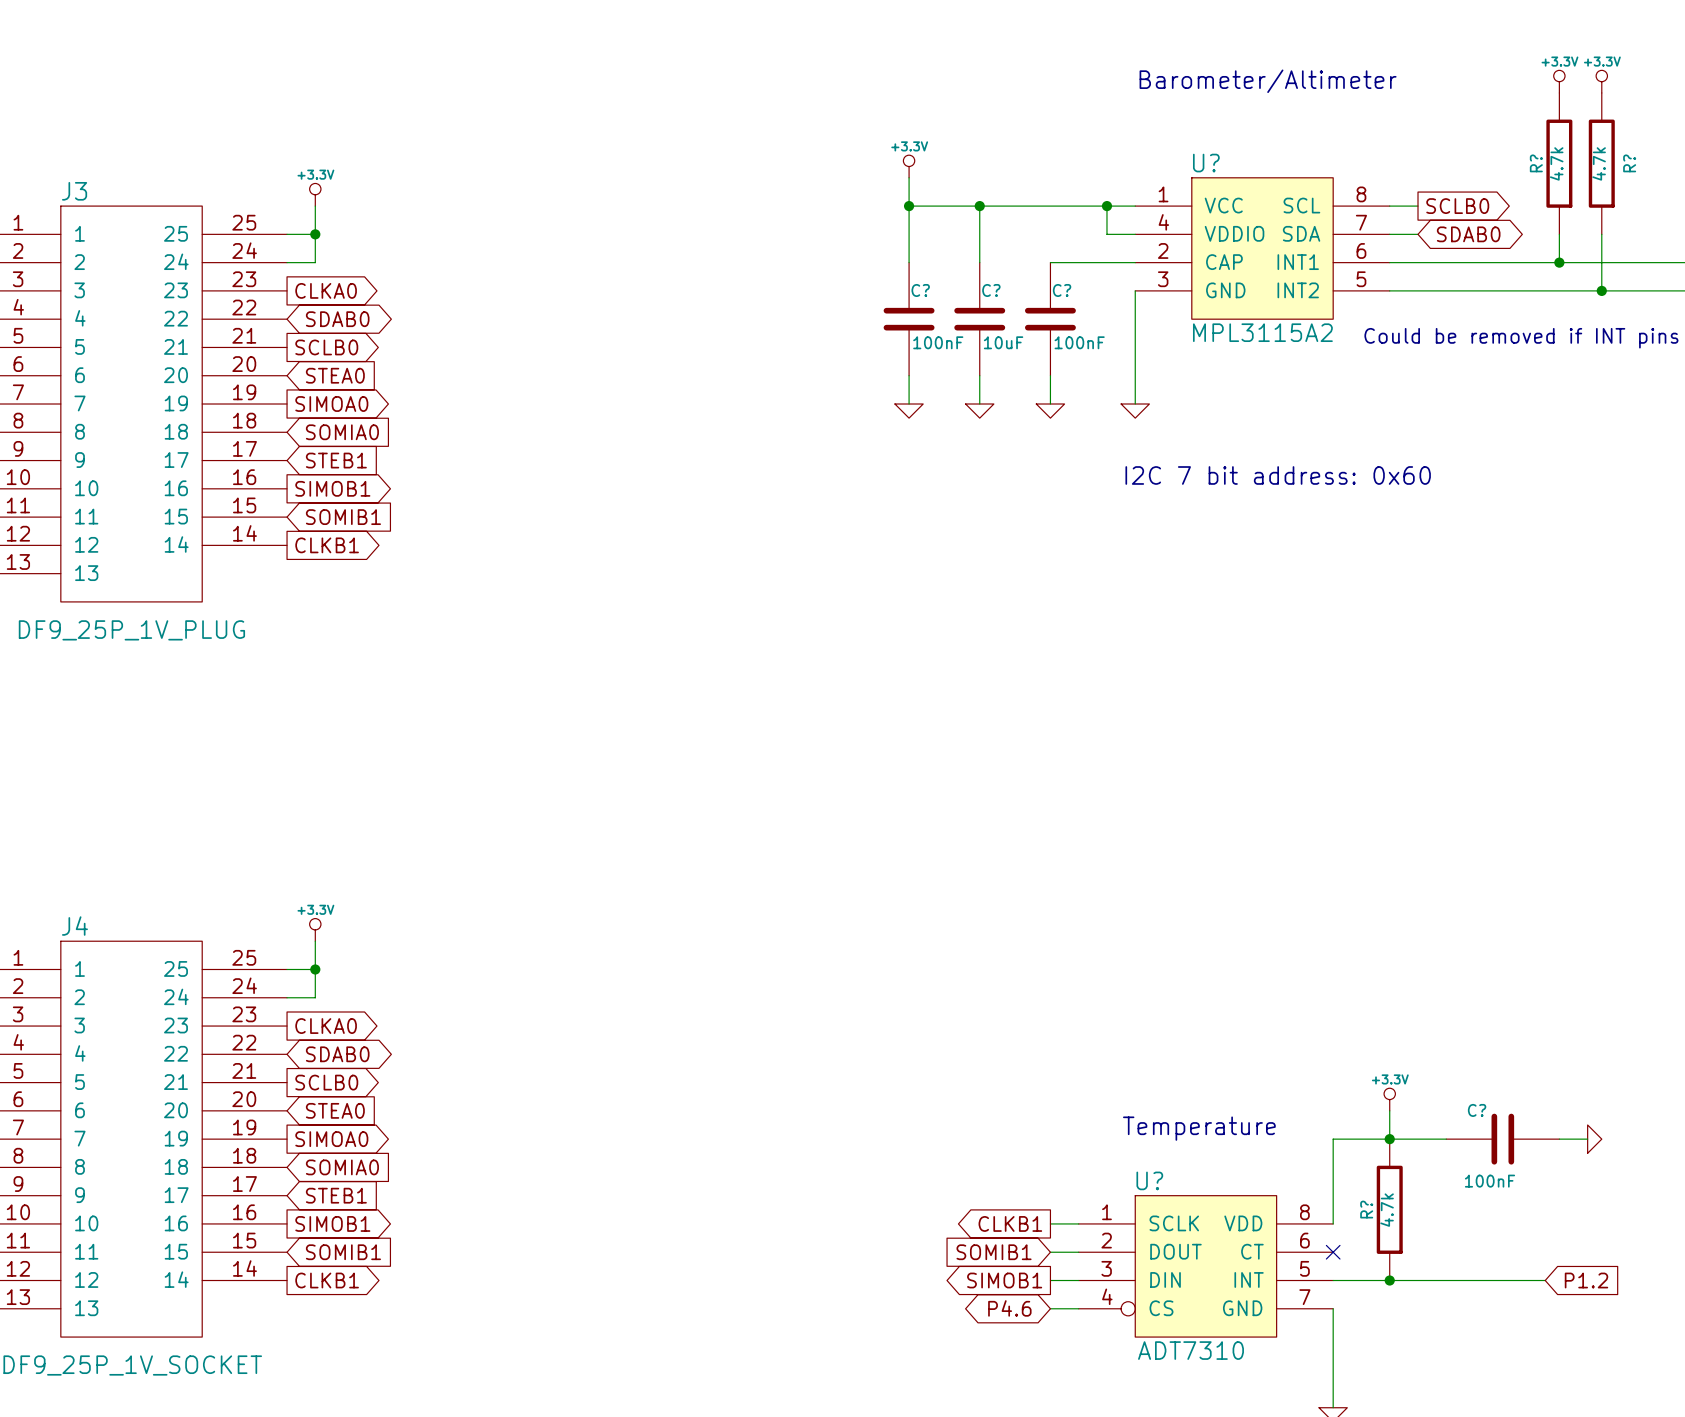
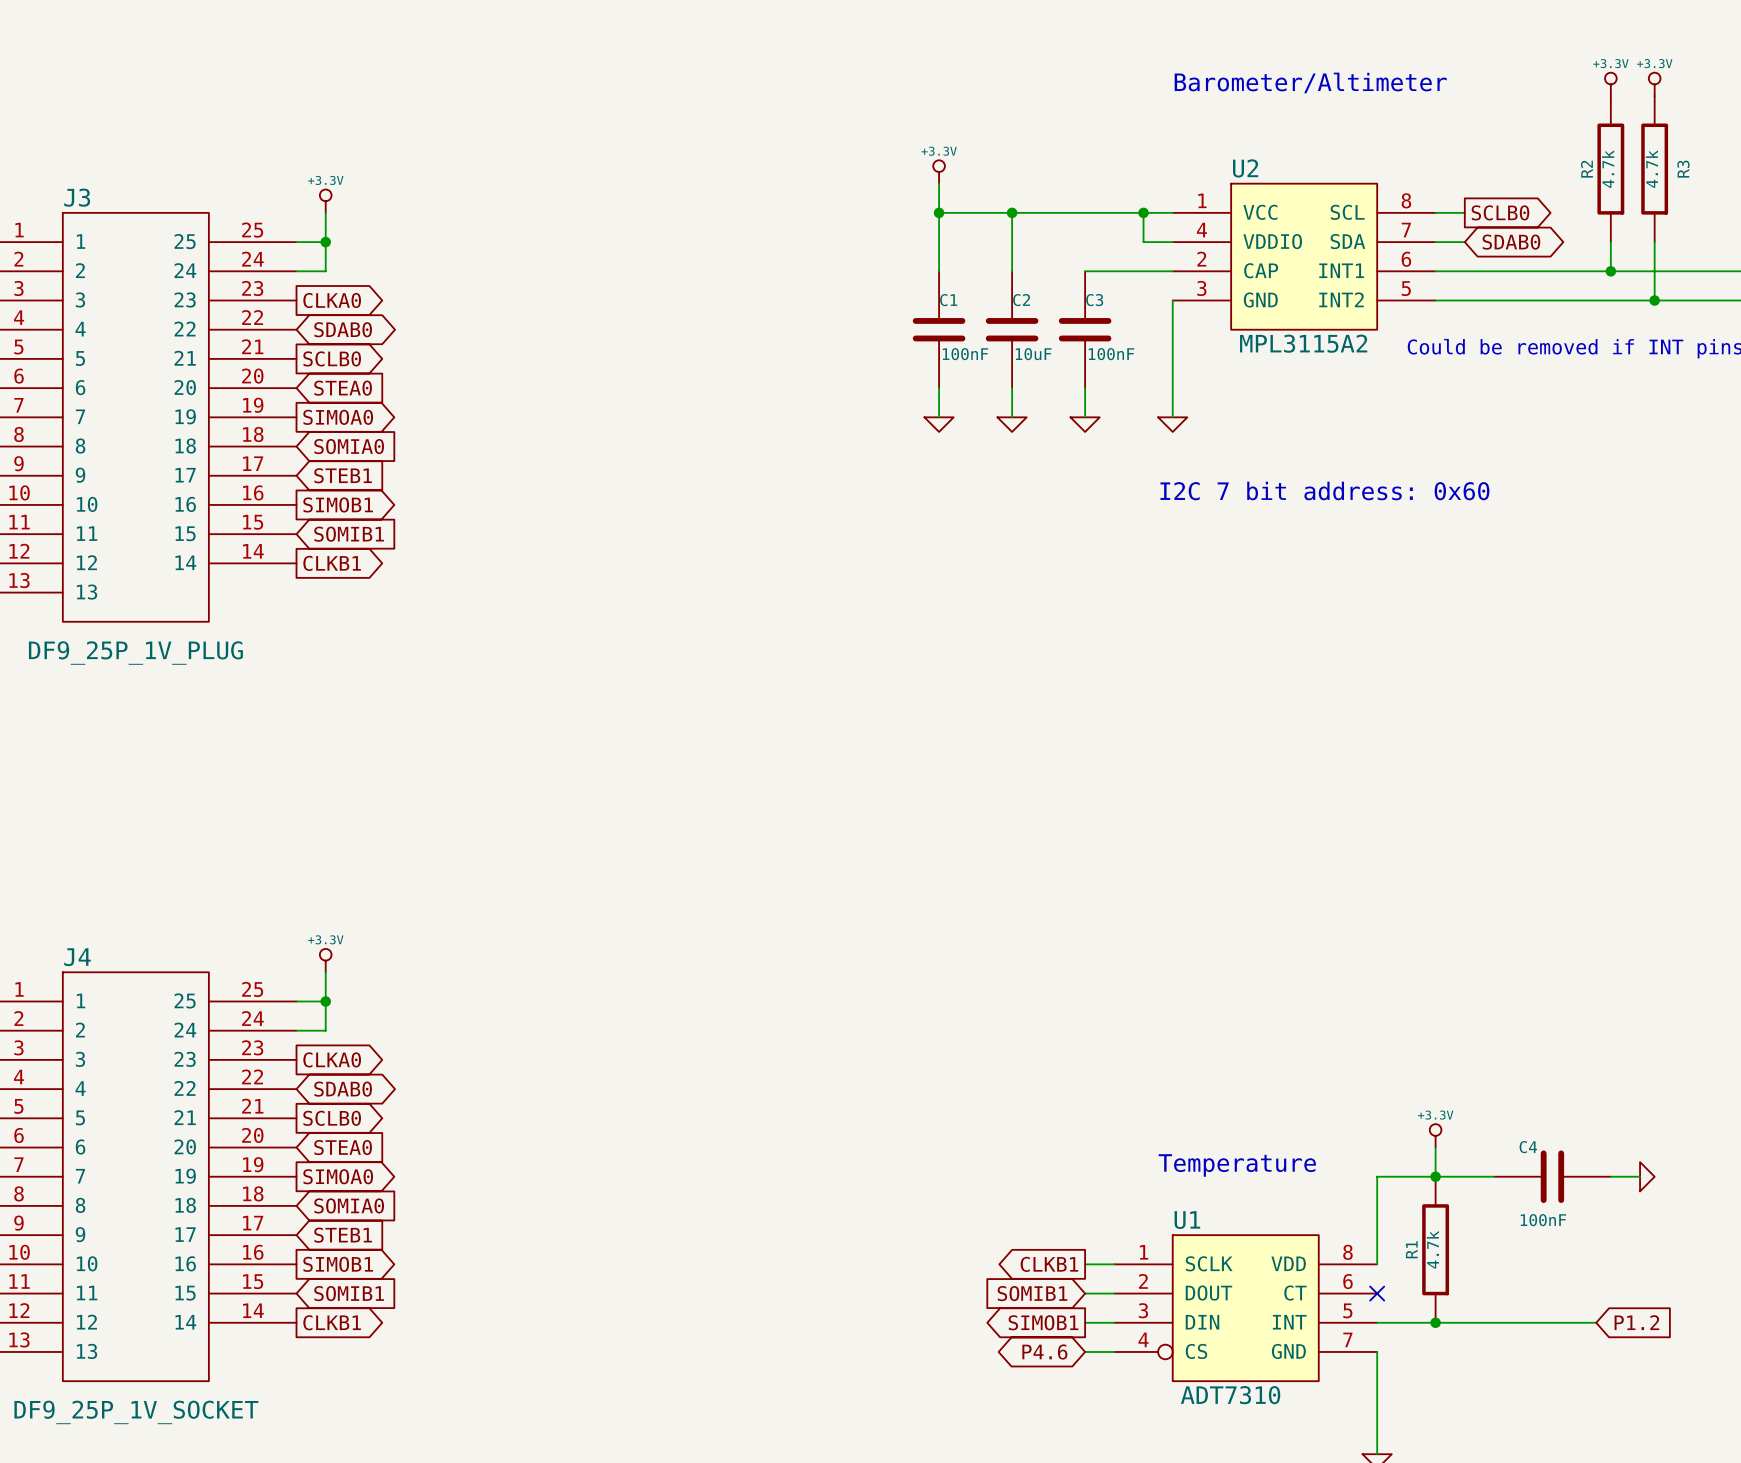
U? name: U? (1206, 163) -> U2 (1245, 168)
R? name: R? (1536, 163) -> R2 (1586, 169)
R? name: R? (1629, 163) -> R3 (1683, 169)
C? name: C? (920, 290) -> C1 (948, 300)
C? name: C? (991, 290) -> C2 (1021, 300)
C? name: C? (1062, 290) -> C3 (1094, 300)
C? name: C? (1477, 1110) -> C4 (1528, 1147)
U? name: U? (1149, 1180) -> U1 (1187, 1220)
R? name: R? (1366, 1209) -> R1 (1411, 1249)

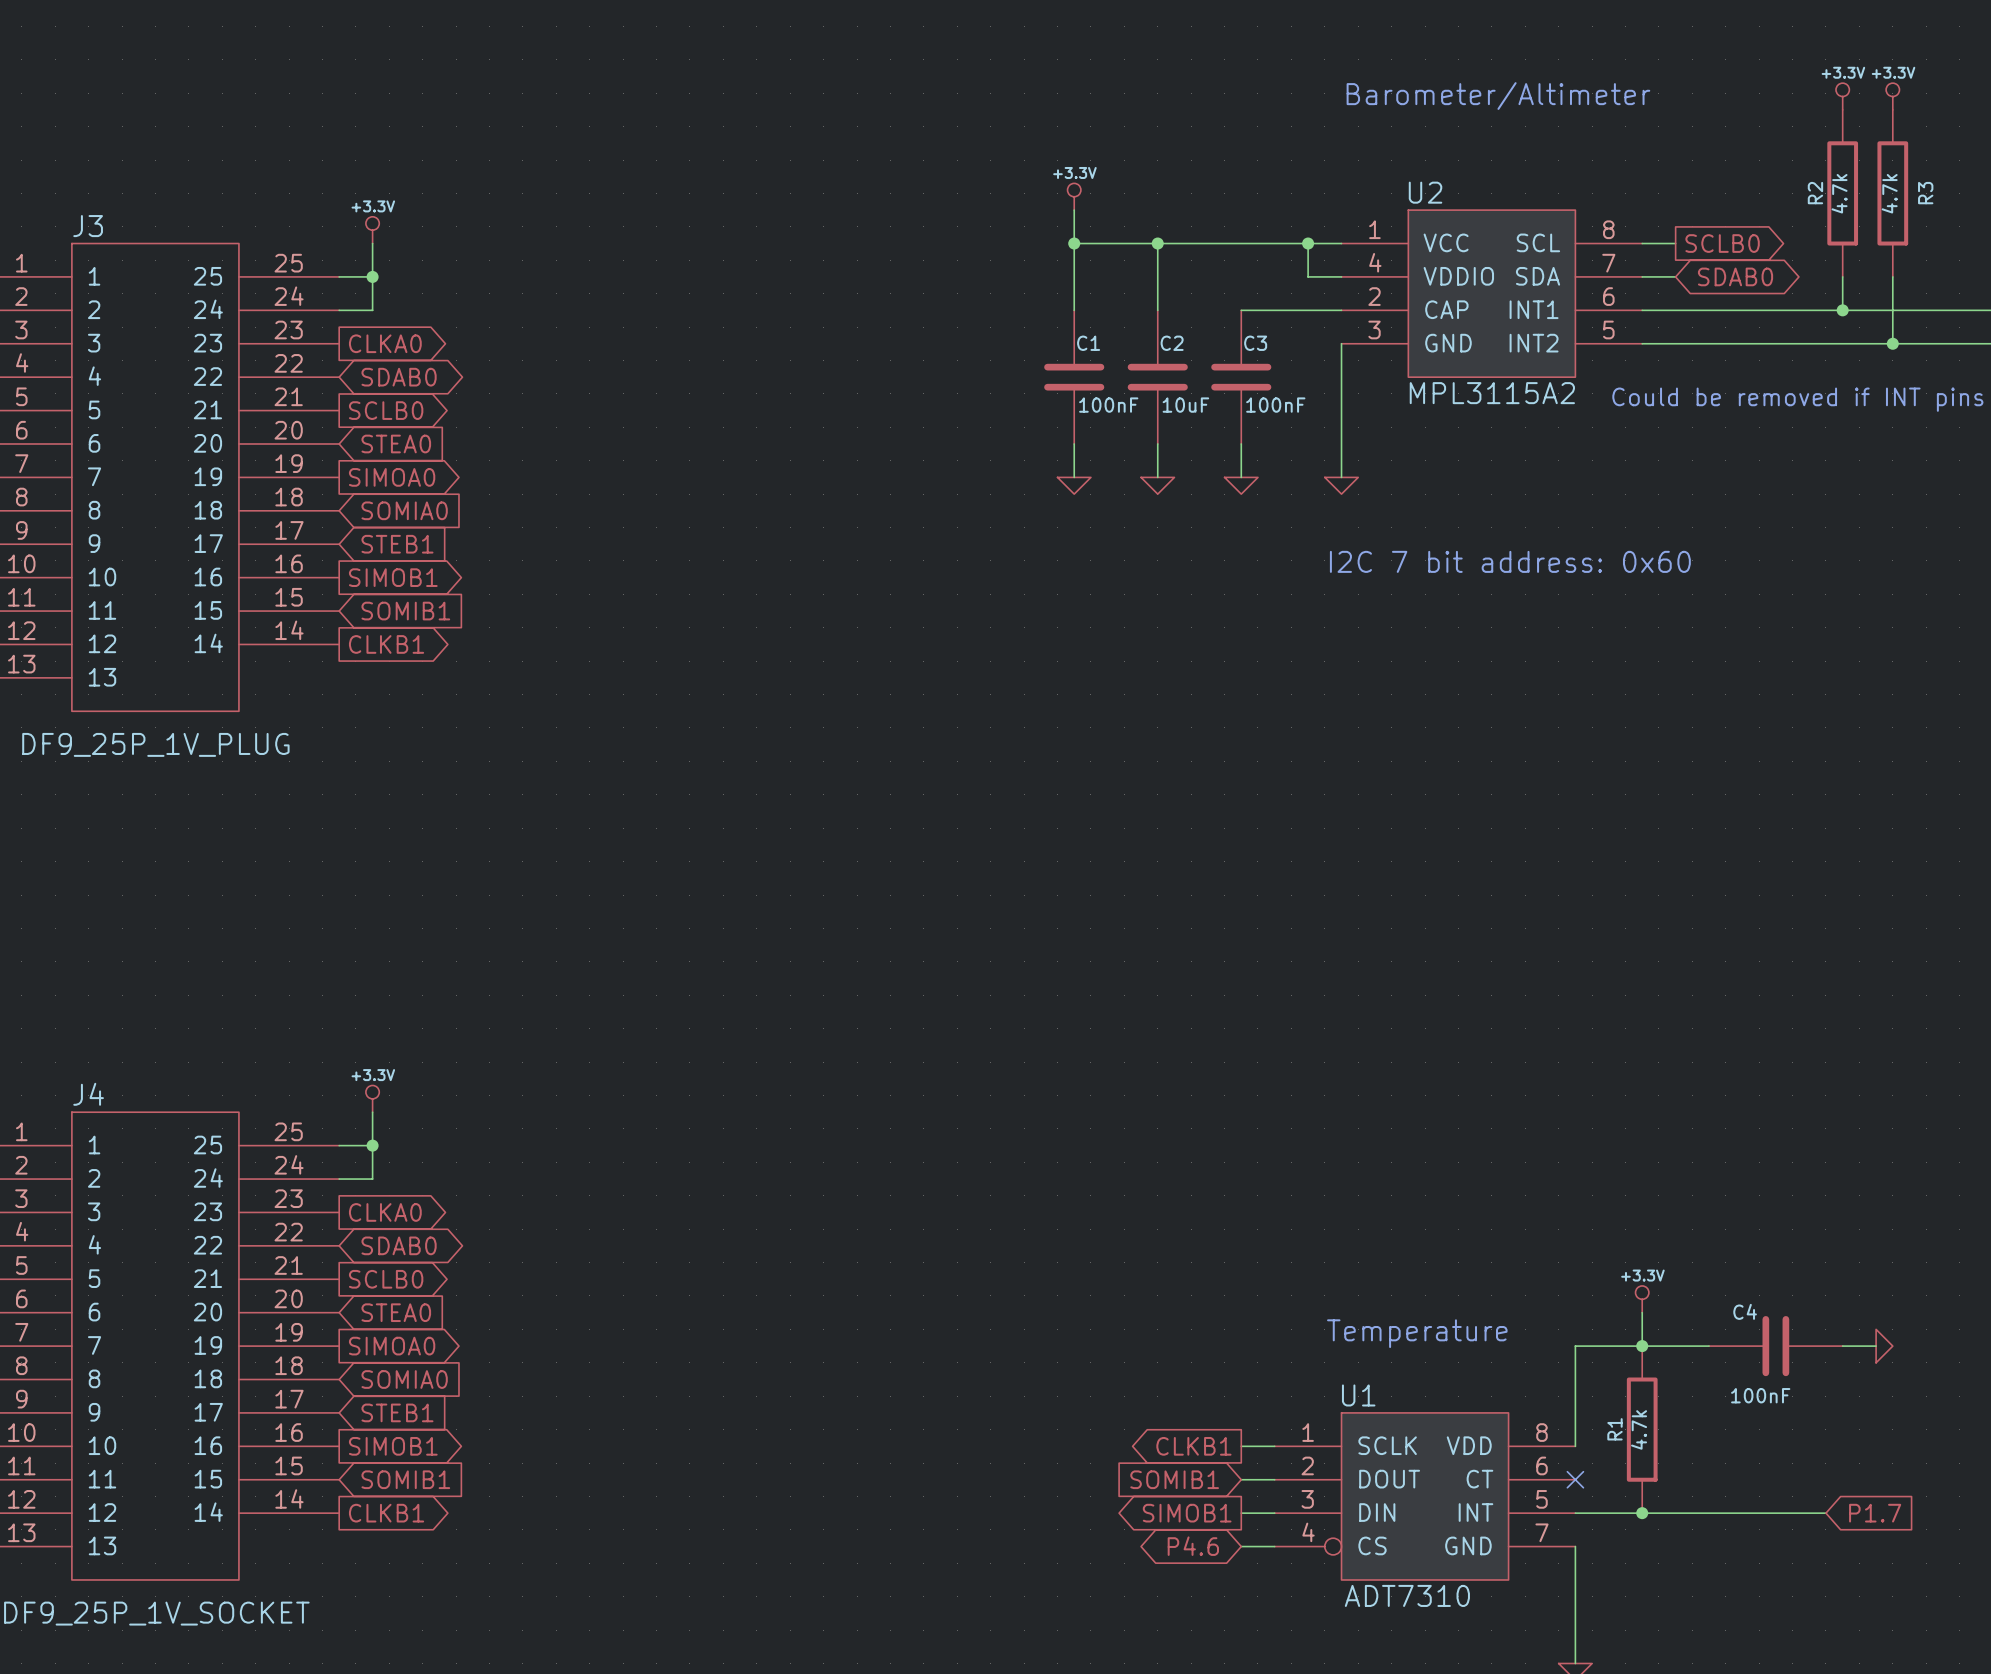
global label: P1.2 (1636, 1322) -> P1.7 (1875, 1513)

